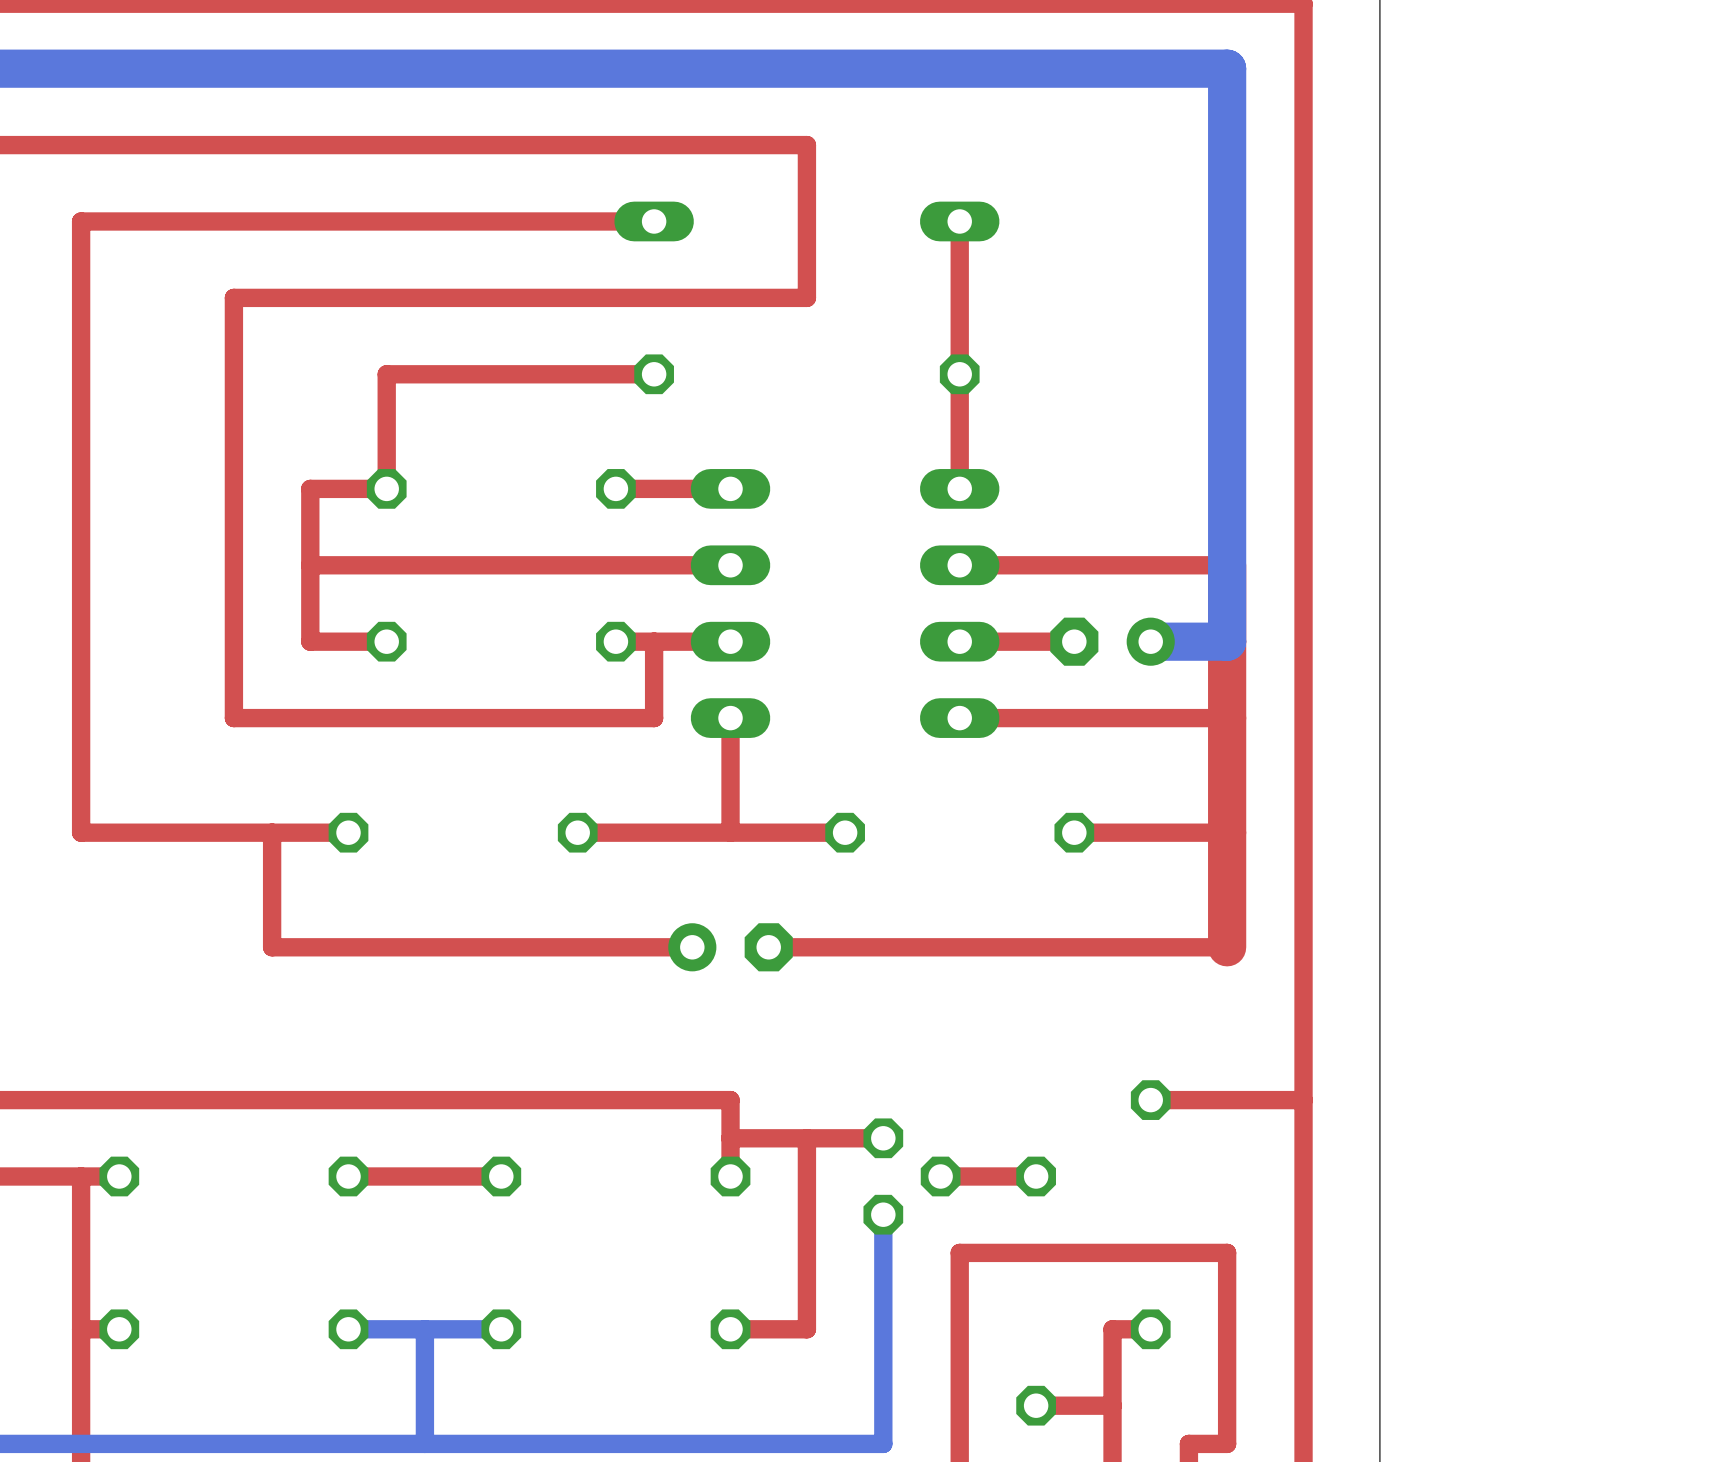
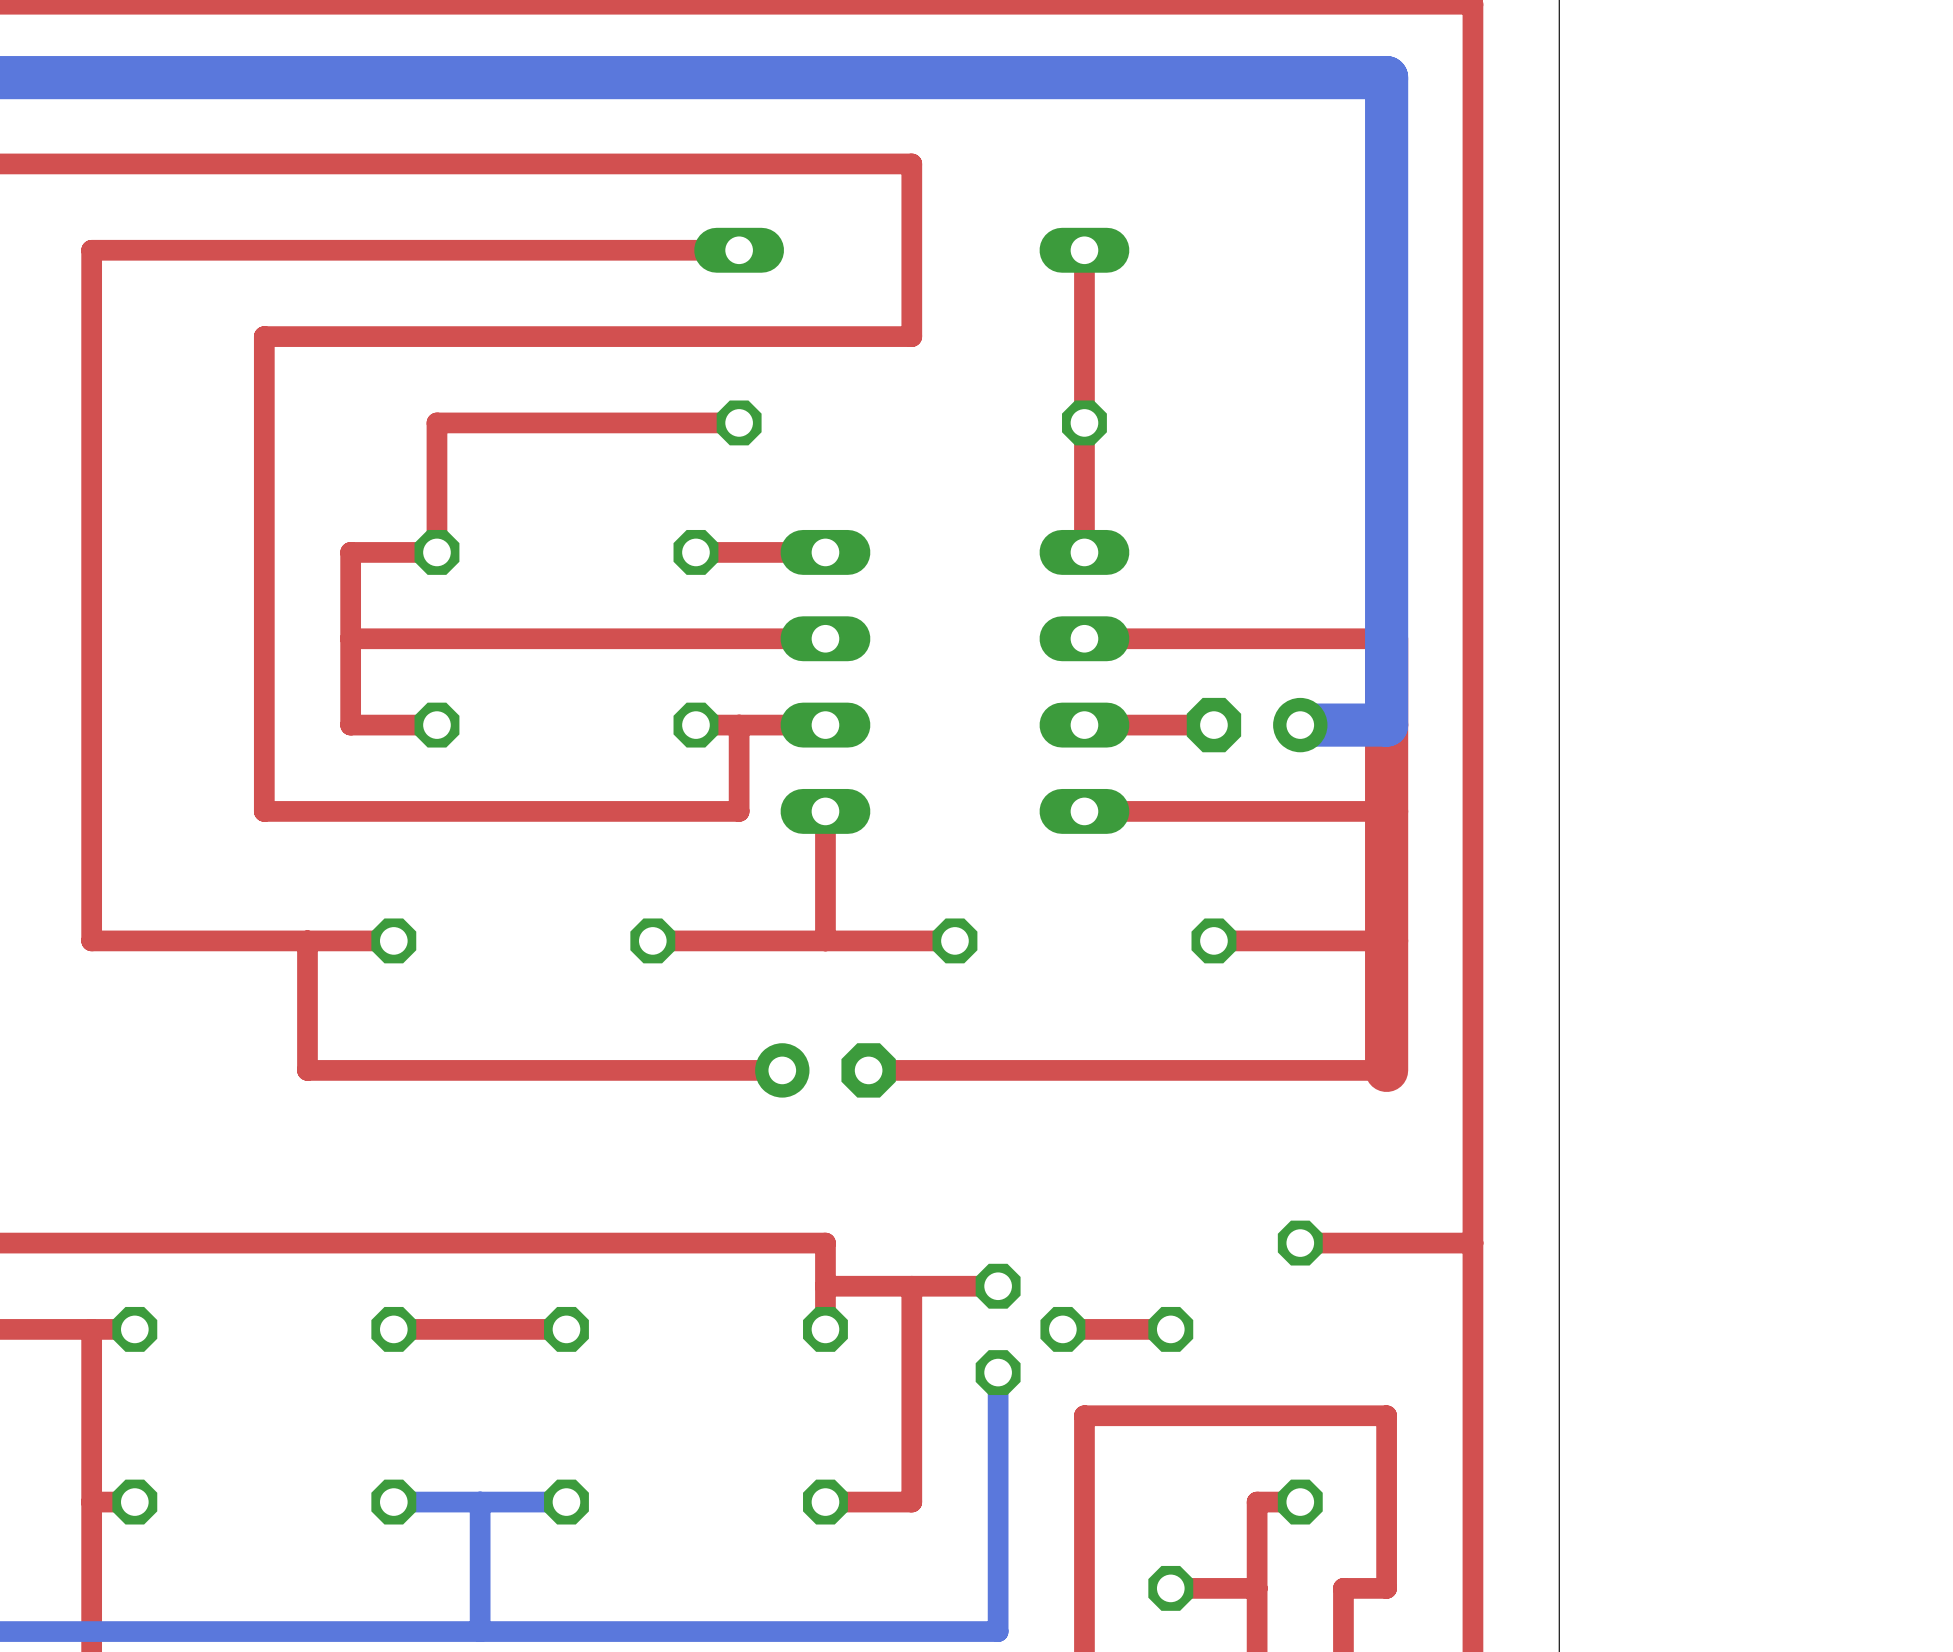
top track: (1227, 1405) (1227, 1443) (1188, 1443) -> (1386, 1588) (1343, 1588) (1343, 1631)

